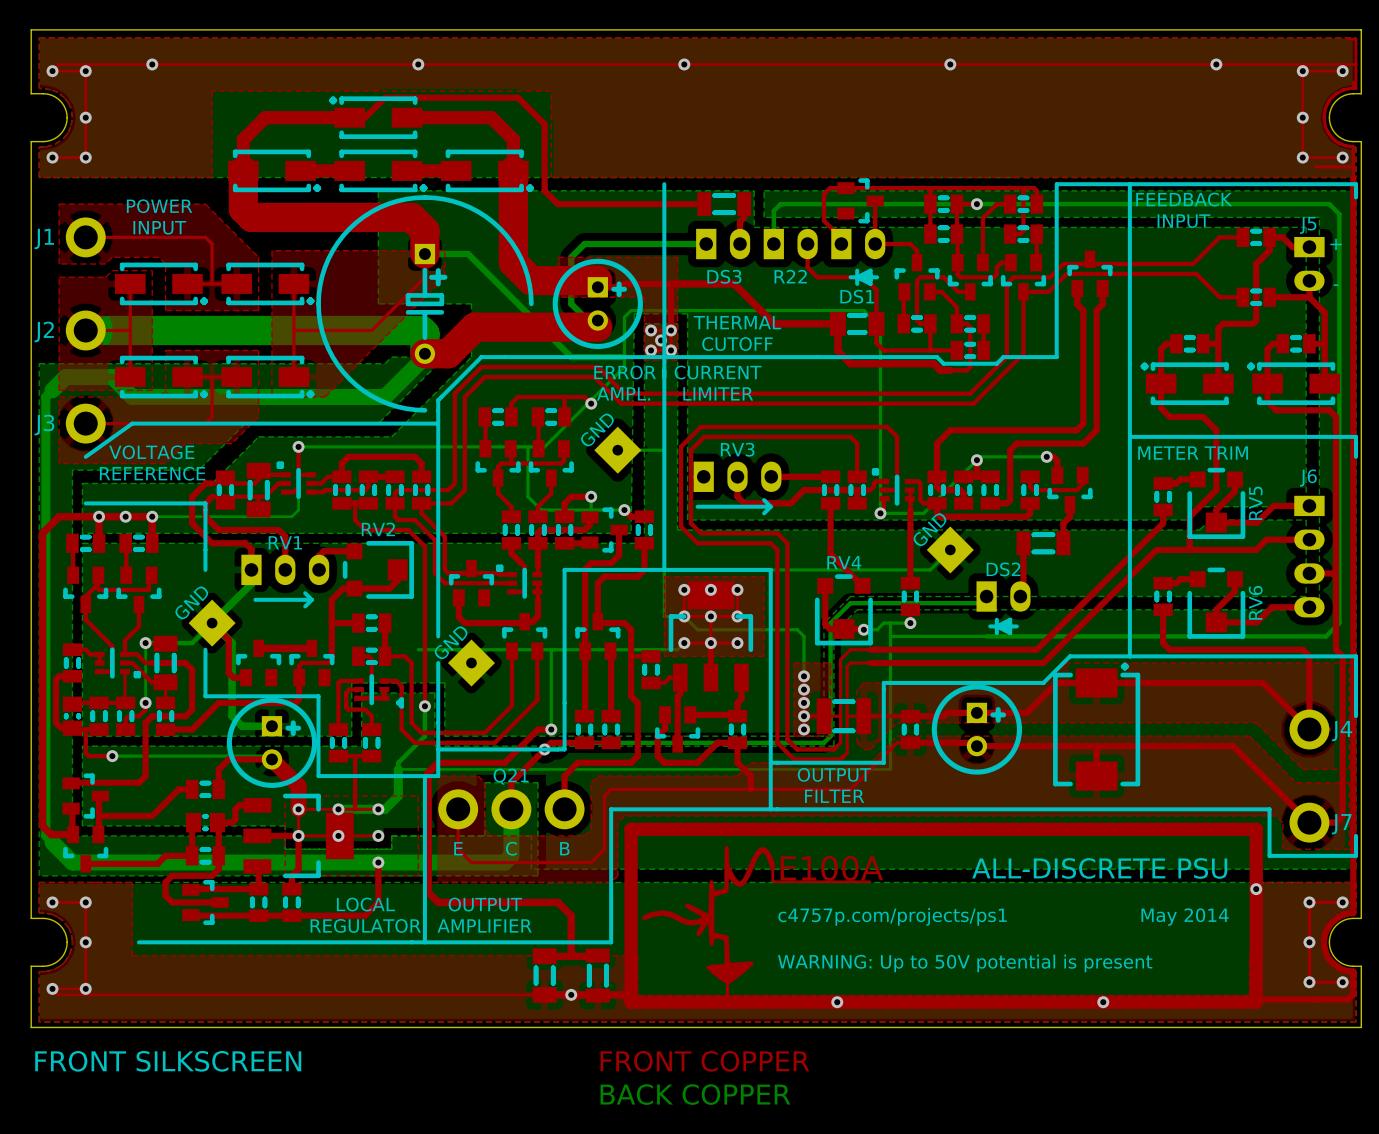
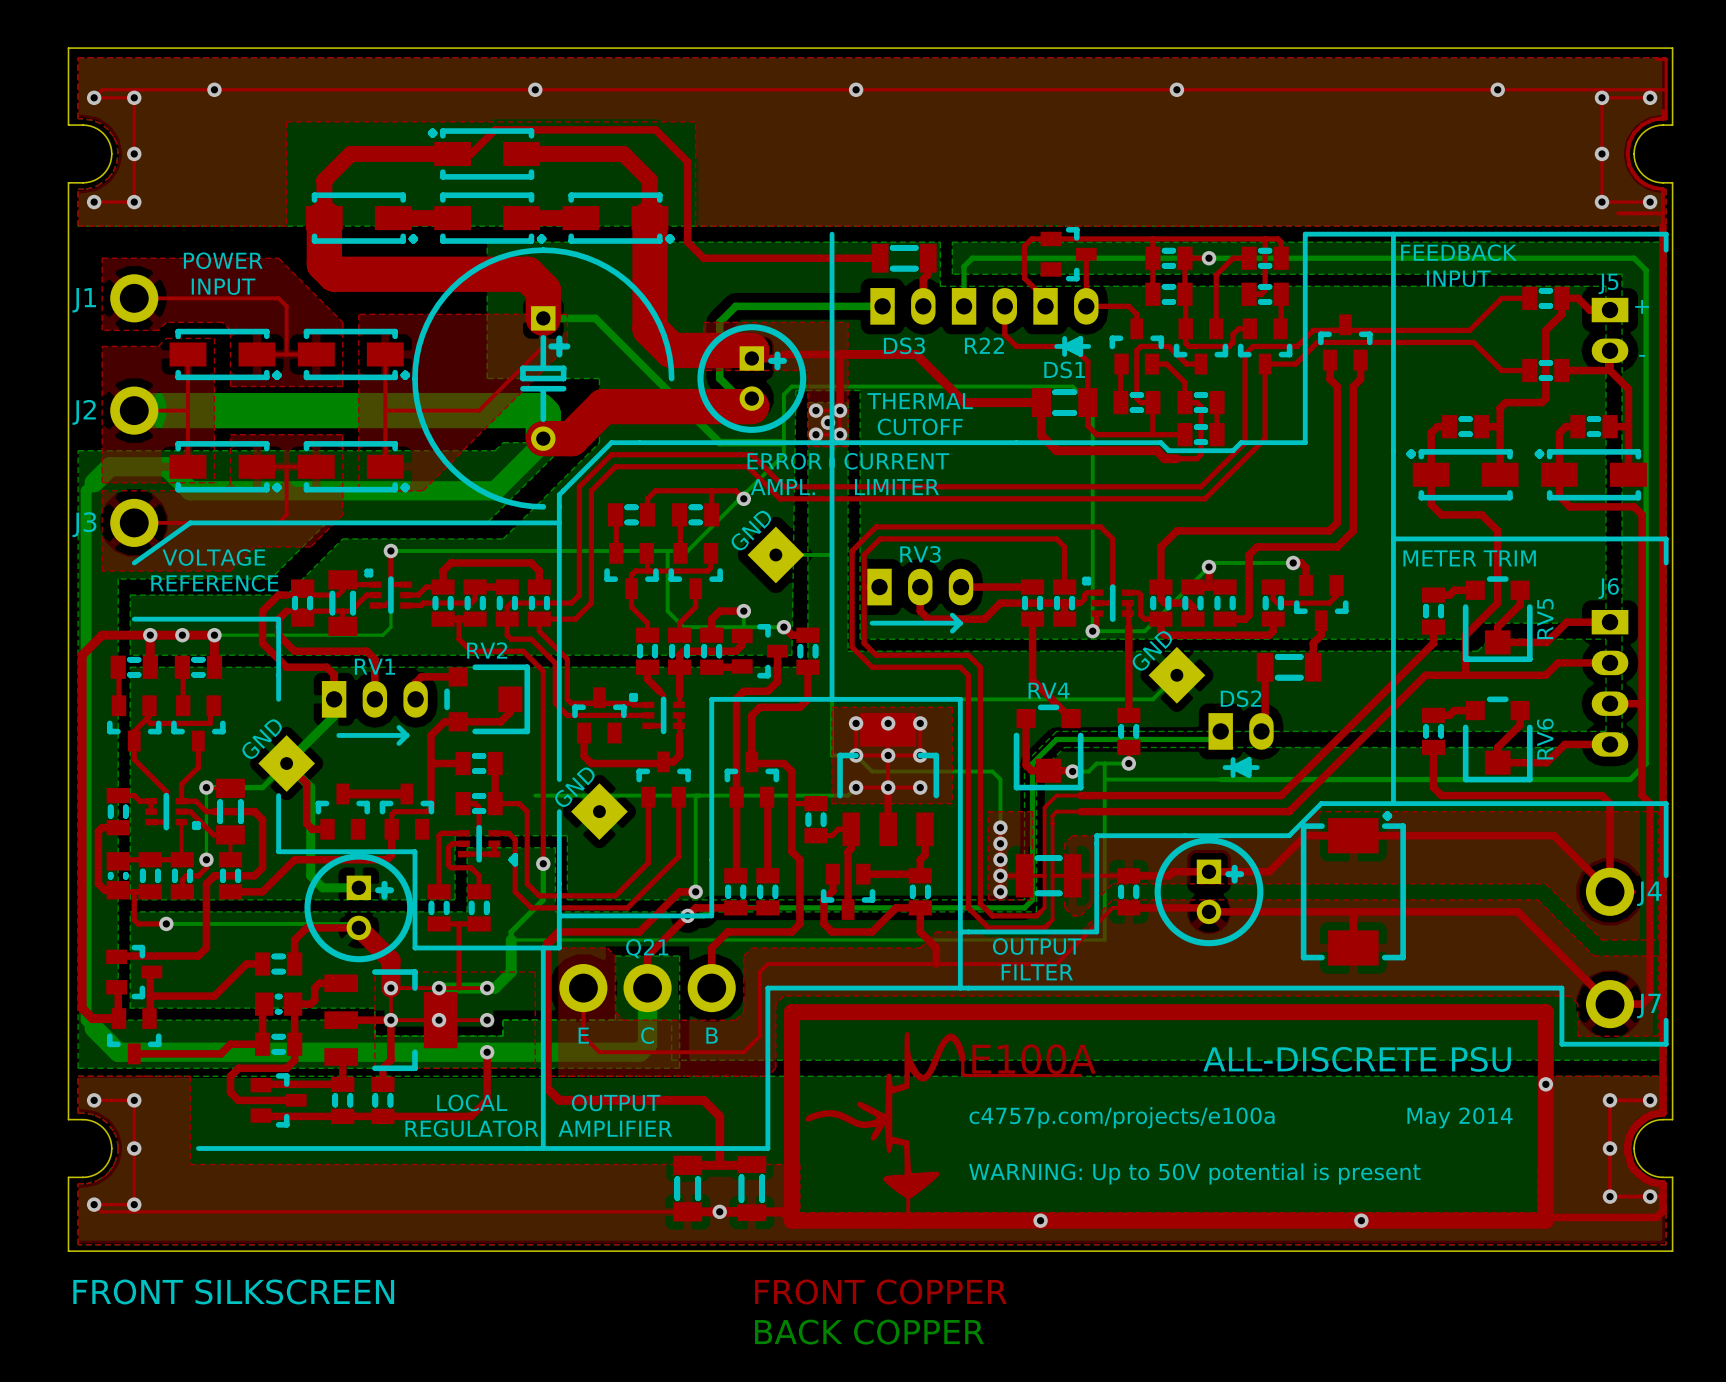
text: c4757p.com/projects/ps1 (892, 916) -> c4757p.com/projects/e100a (1122, 1117)

